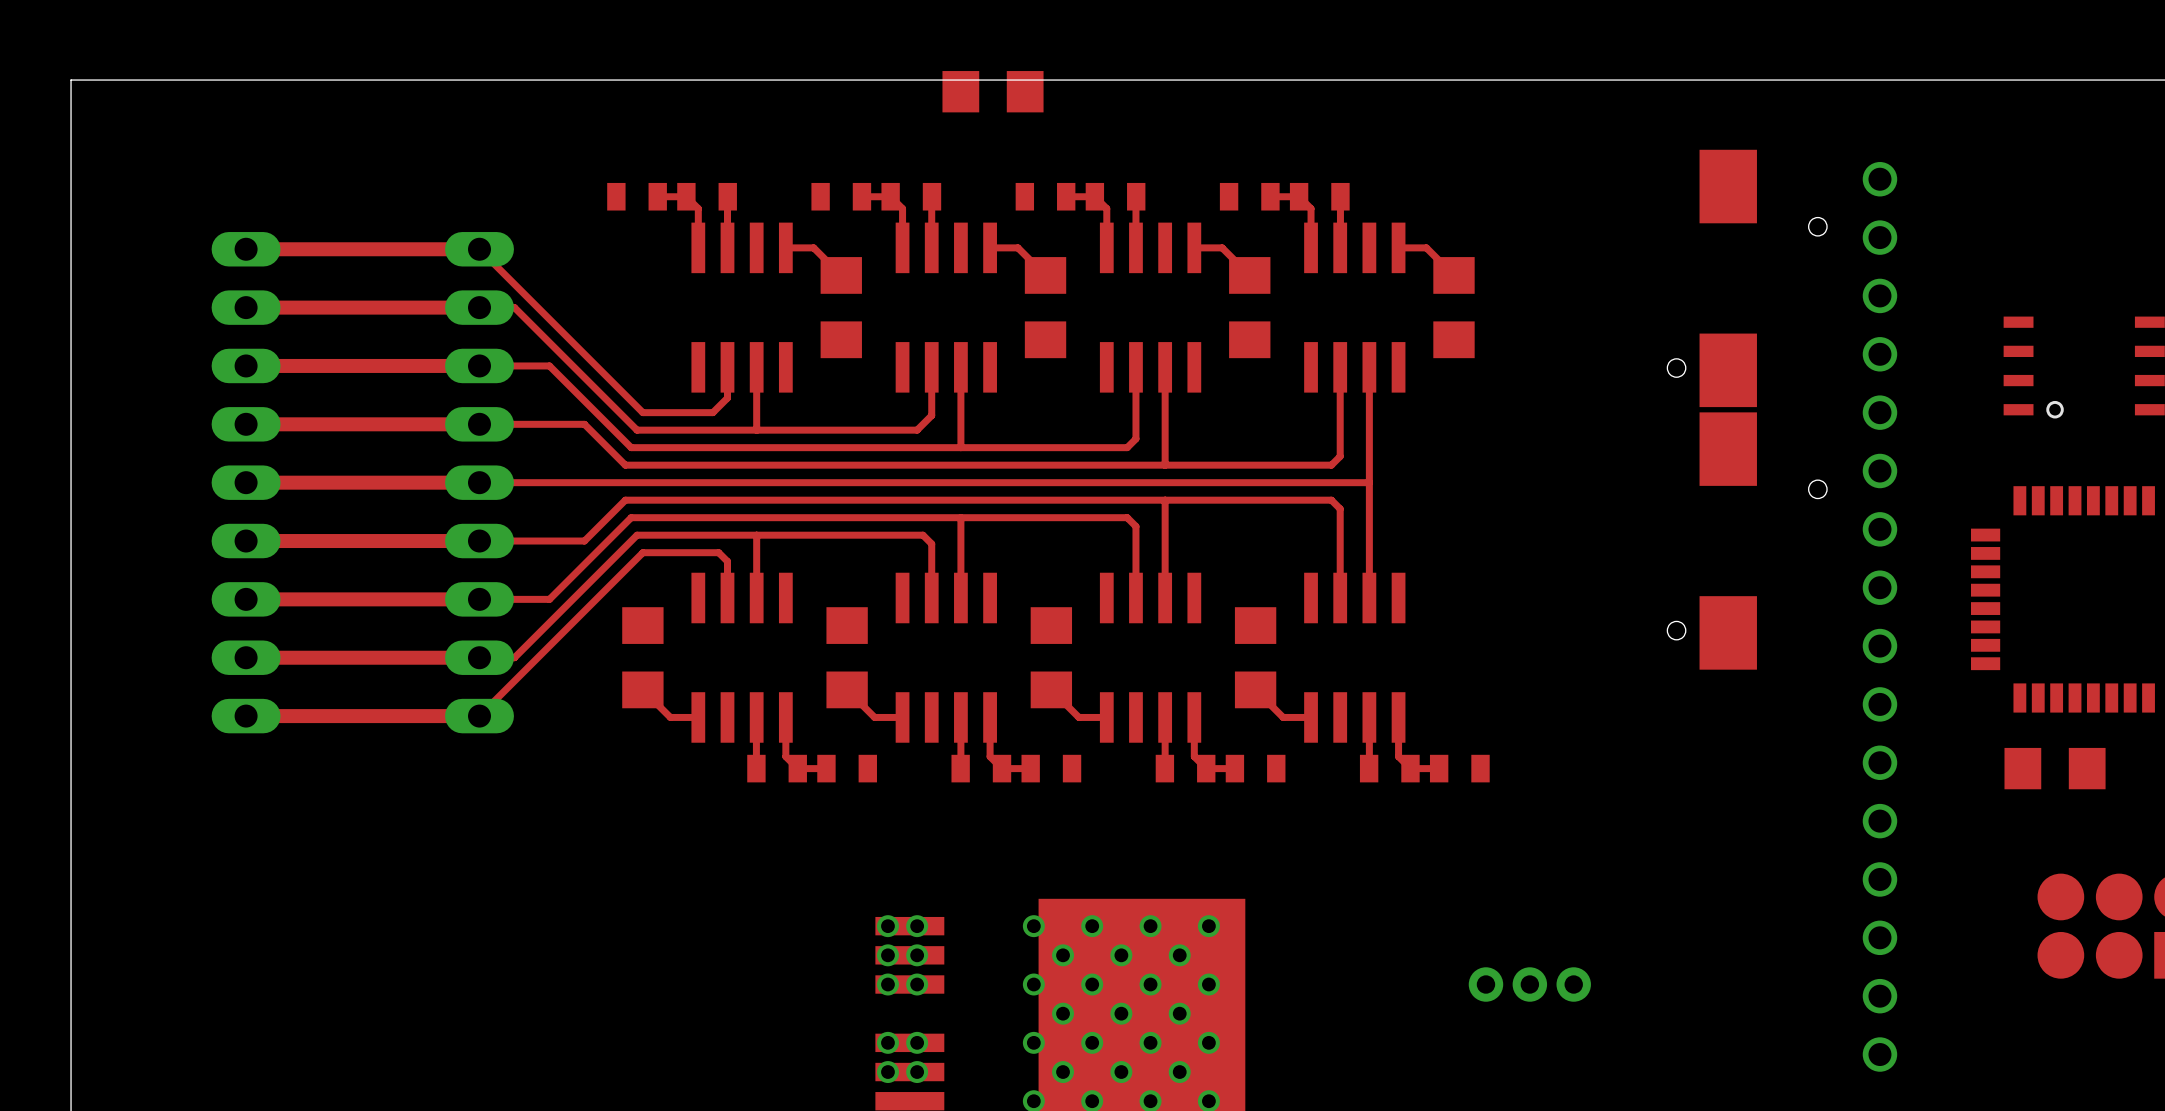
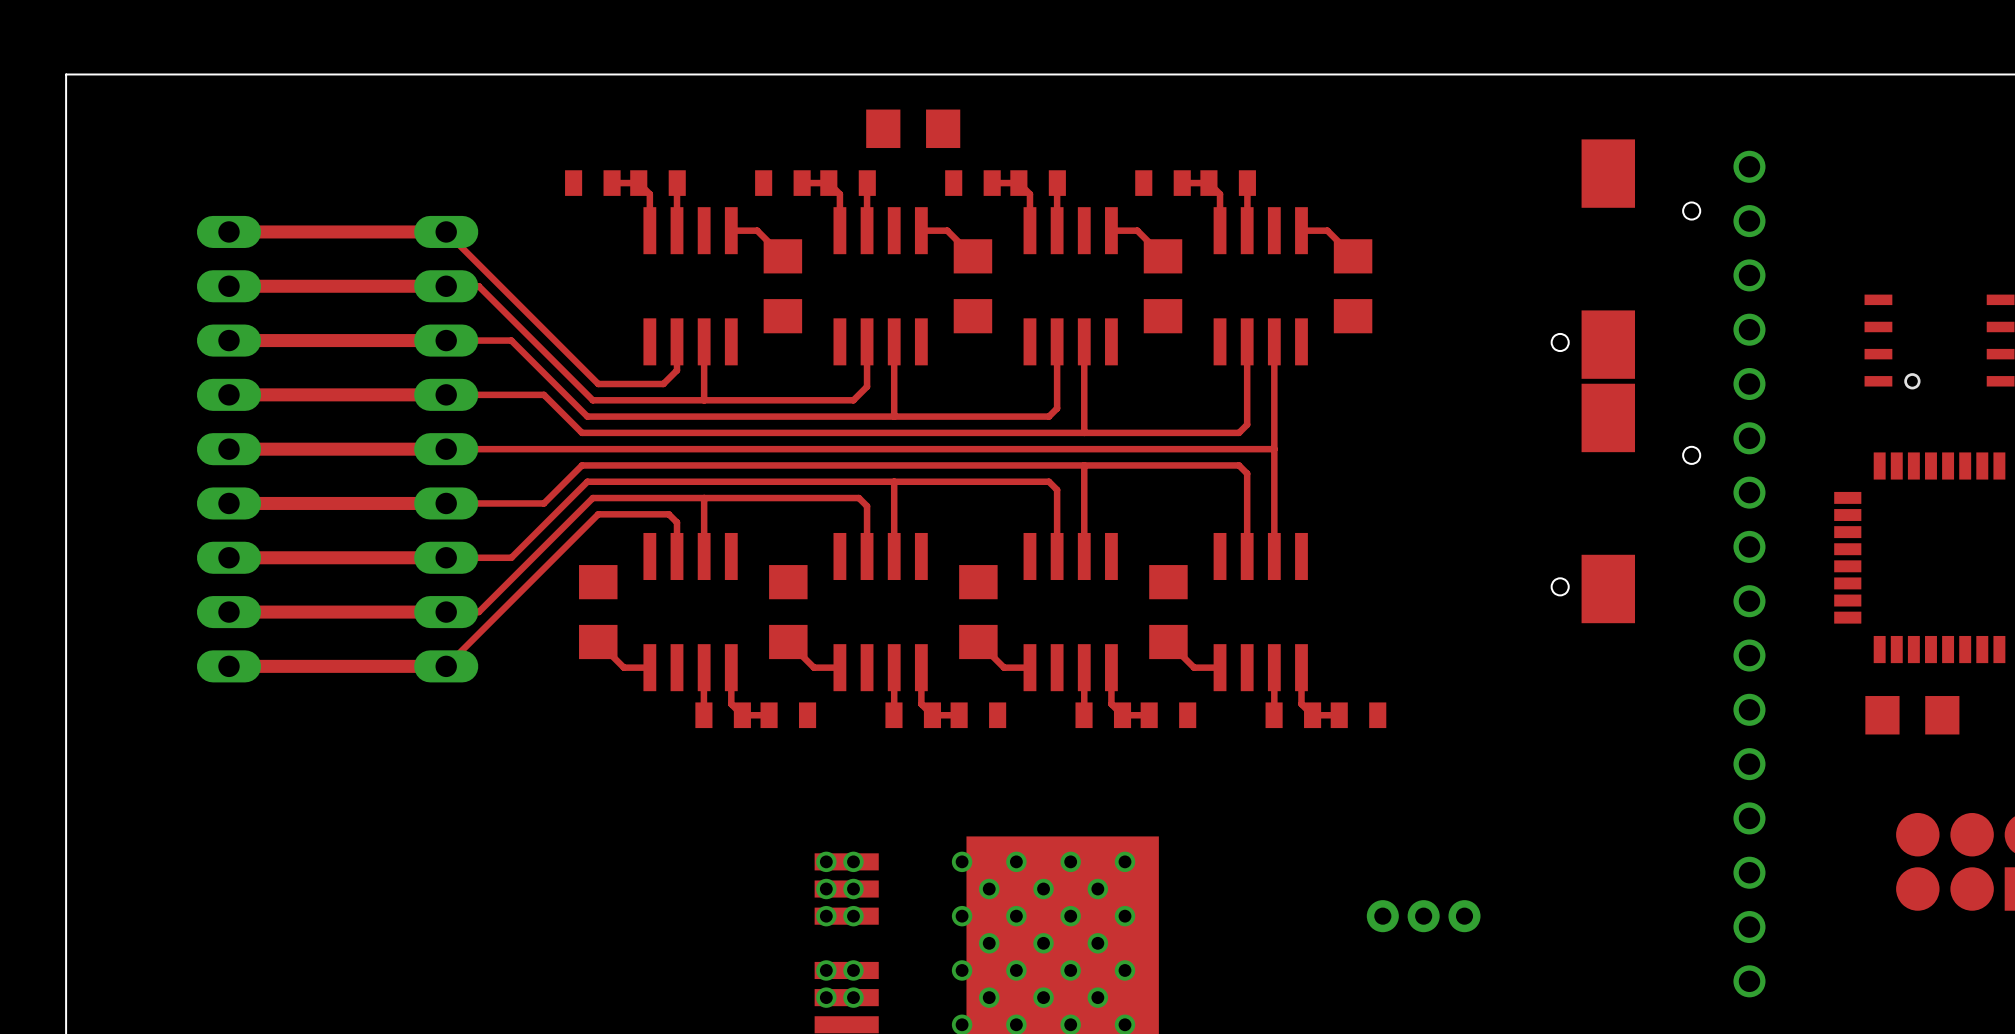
part position: (993, 91) -> (913, 128)

